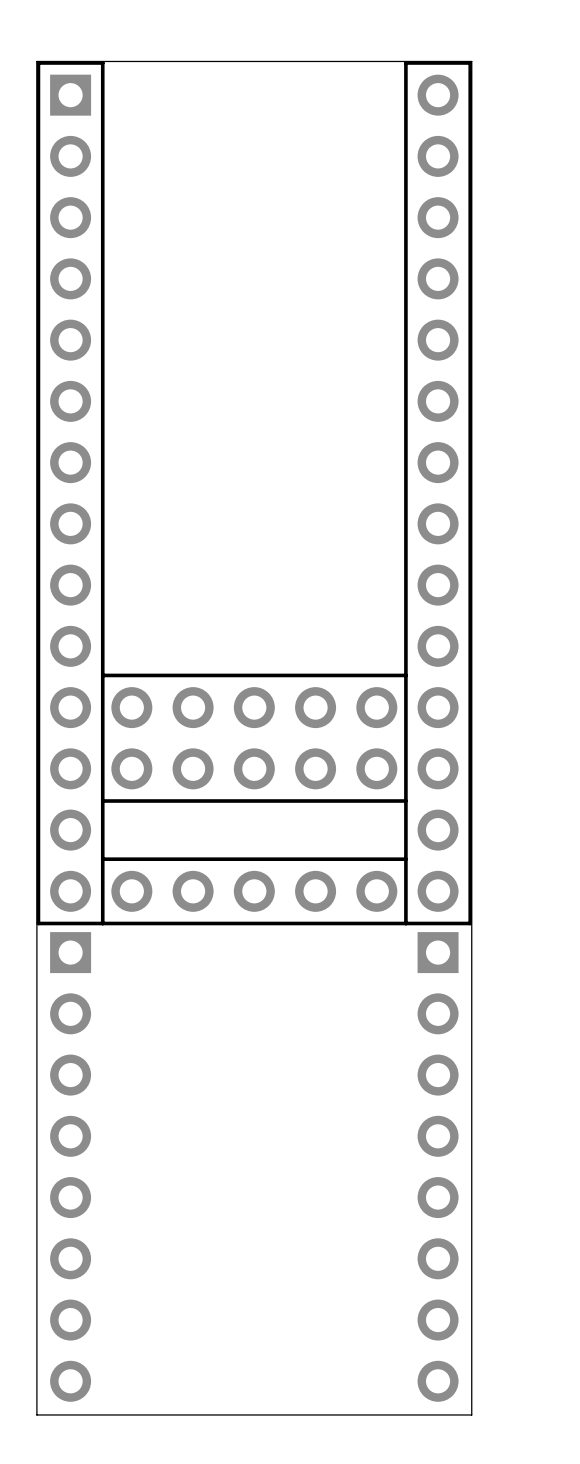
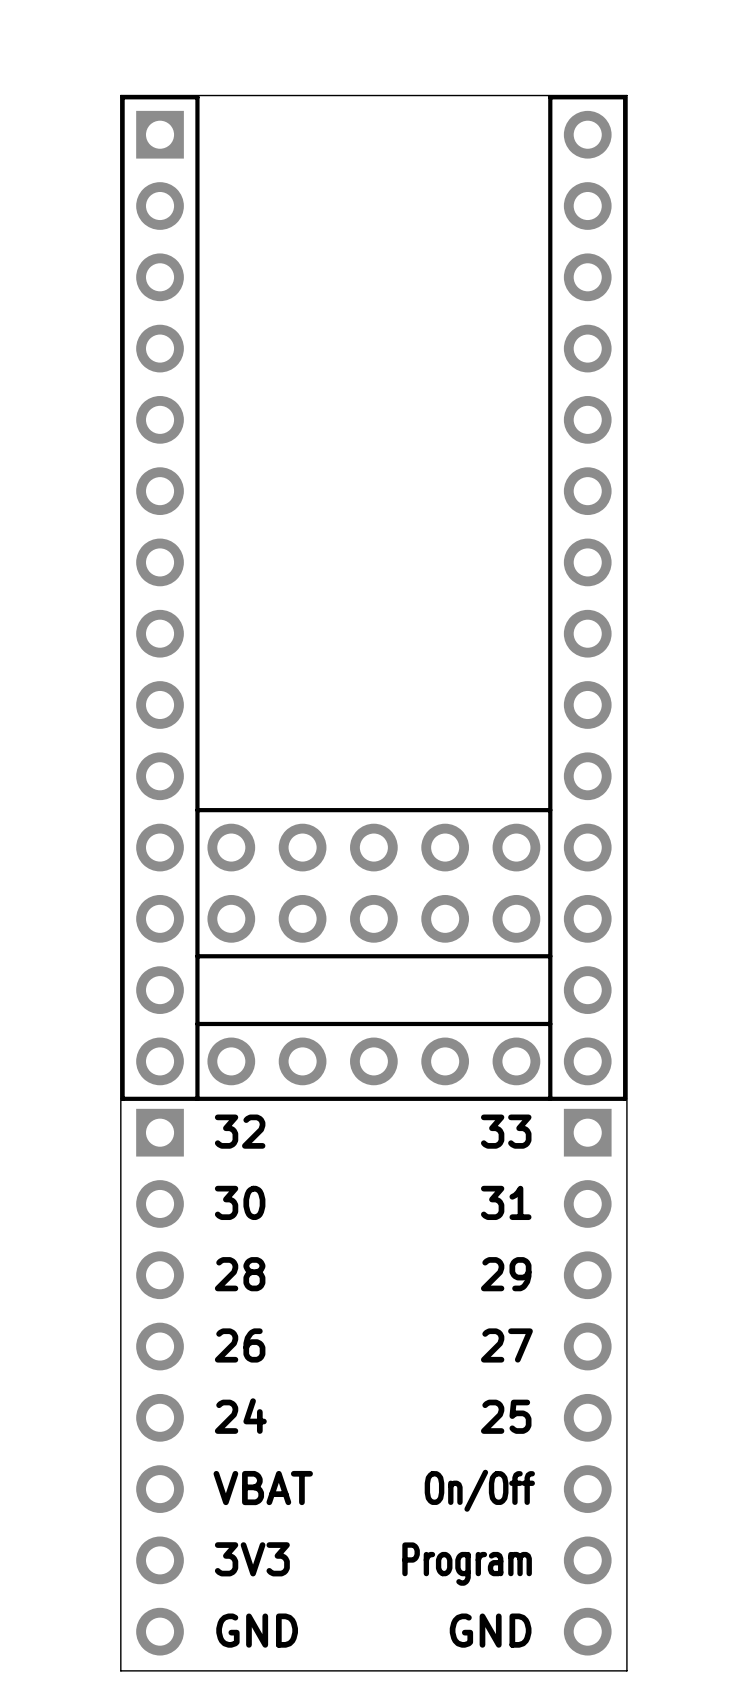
text: none -> 32 (240, 1131)
text: none -> 33 (506, 1131)
text: none -> 30 (240, 1202)
text: none -> 31 (506, 1202)
text: none -> 28 (240, 1274)
text: none -> 29 (506, 1274)
text: none -> 26 (240, 1345)
text: none -> 27 (506, 1345)
text: none -> 24 (240, 1416)
text: none -> 25 (506, 1416)
text: none -> VBAT (263, 1488)
text: none -> On/Off (479, 1490)
text: none -> 3V3 (252, 1559)
text: none -> Program (467, 1564)
text: none -> GND (257, 1630)
text: none -> GND (490, 1630)

